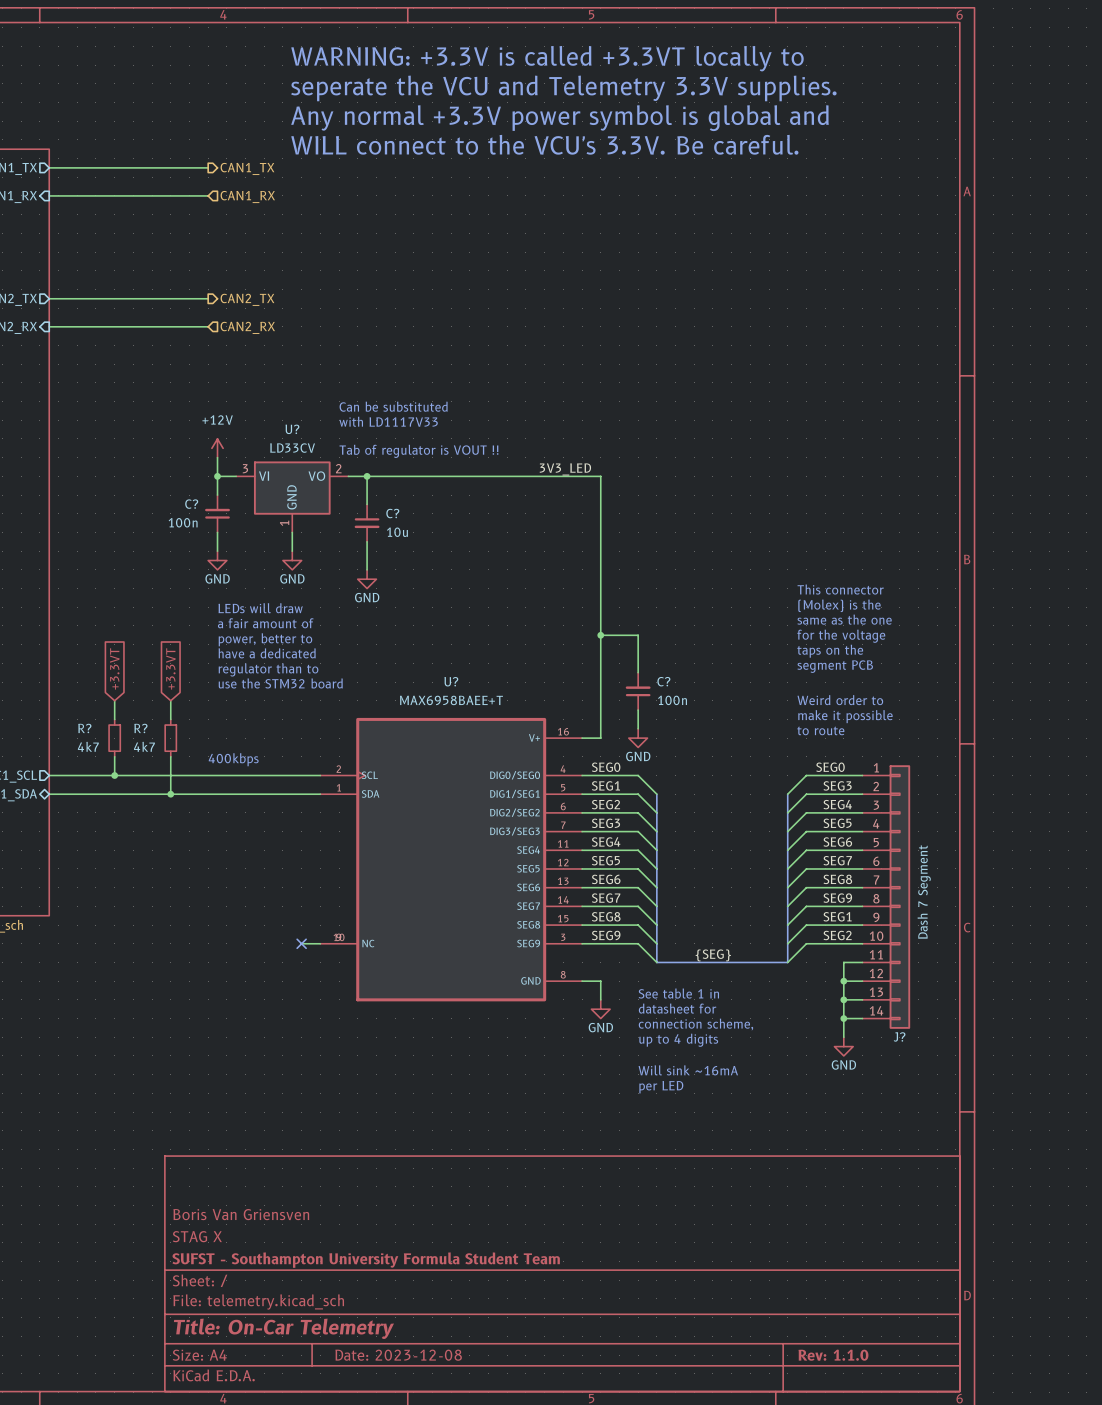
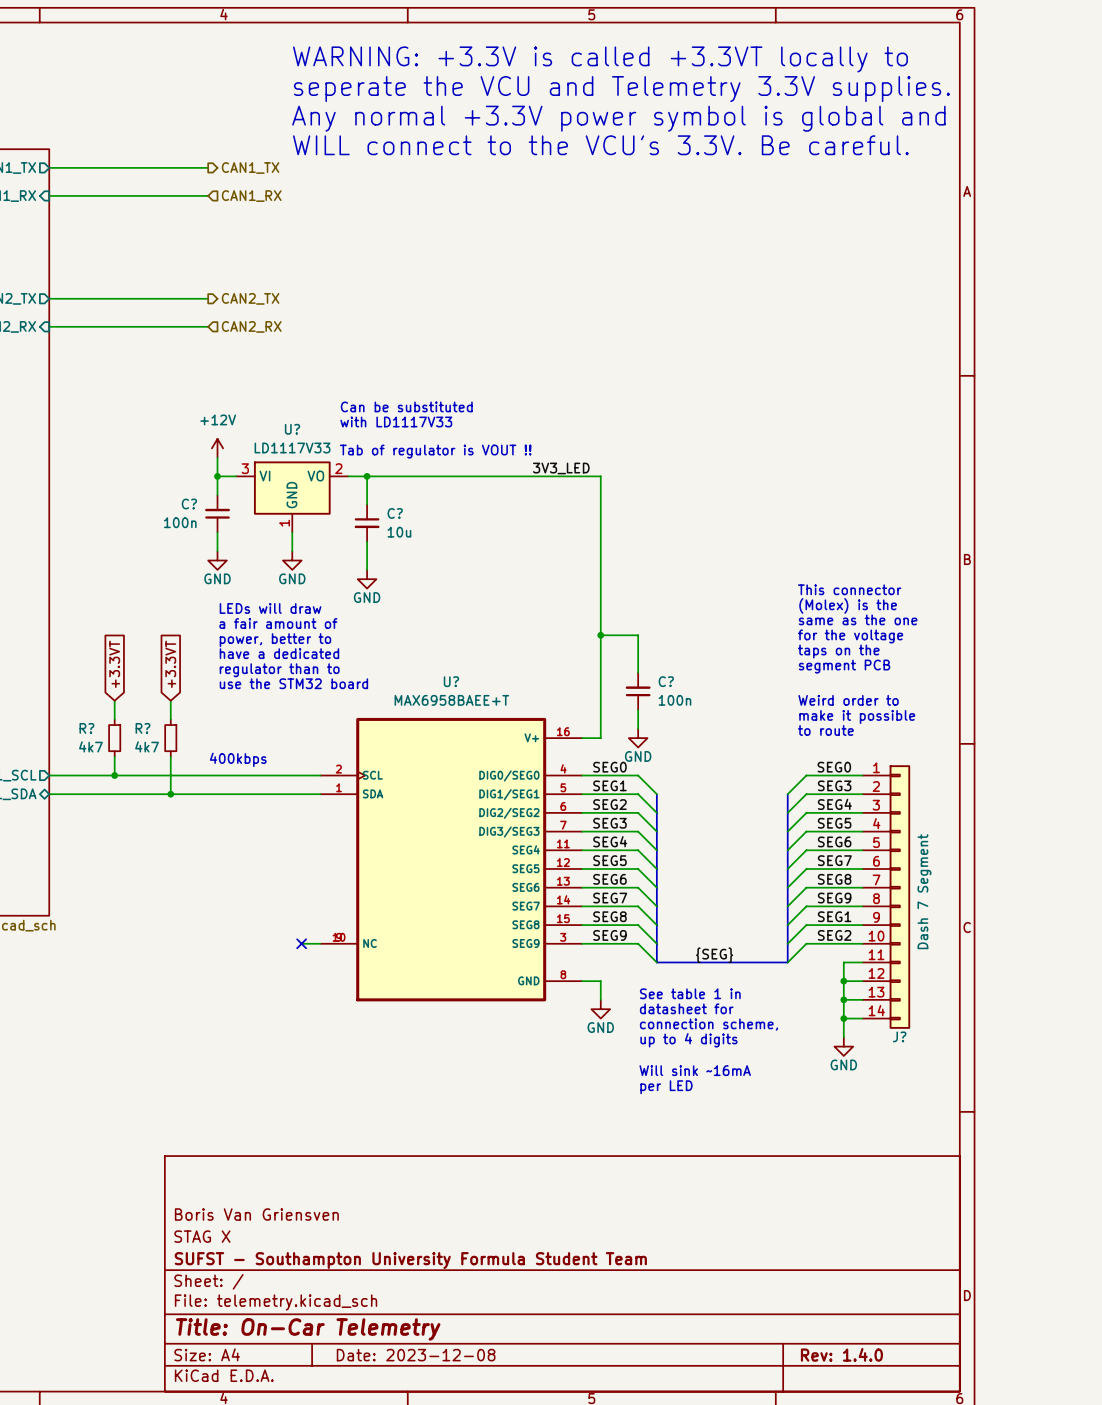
U? value: LD33CV (292, 448) -> LD1117V33 (292, 447)
title block: Rev: 1.1.0 (833, 1355) -> Rev: 1.4.0 (841, 1354)

